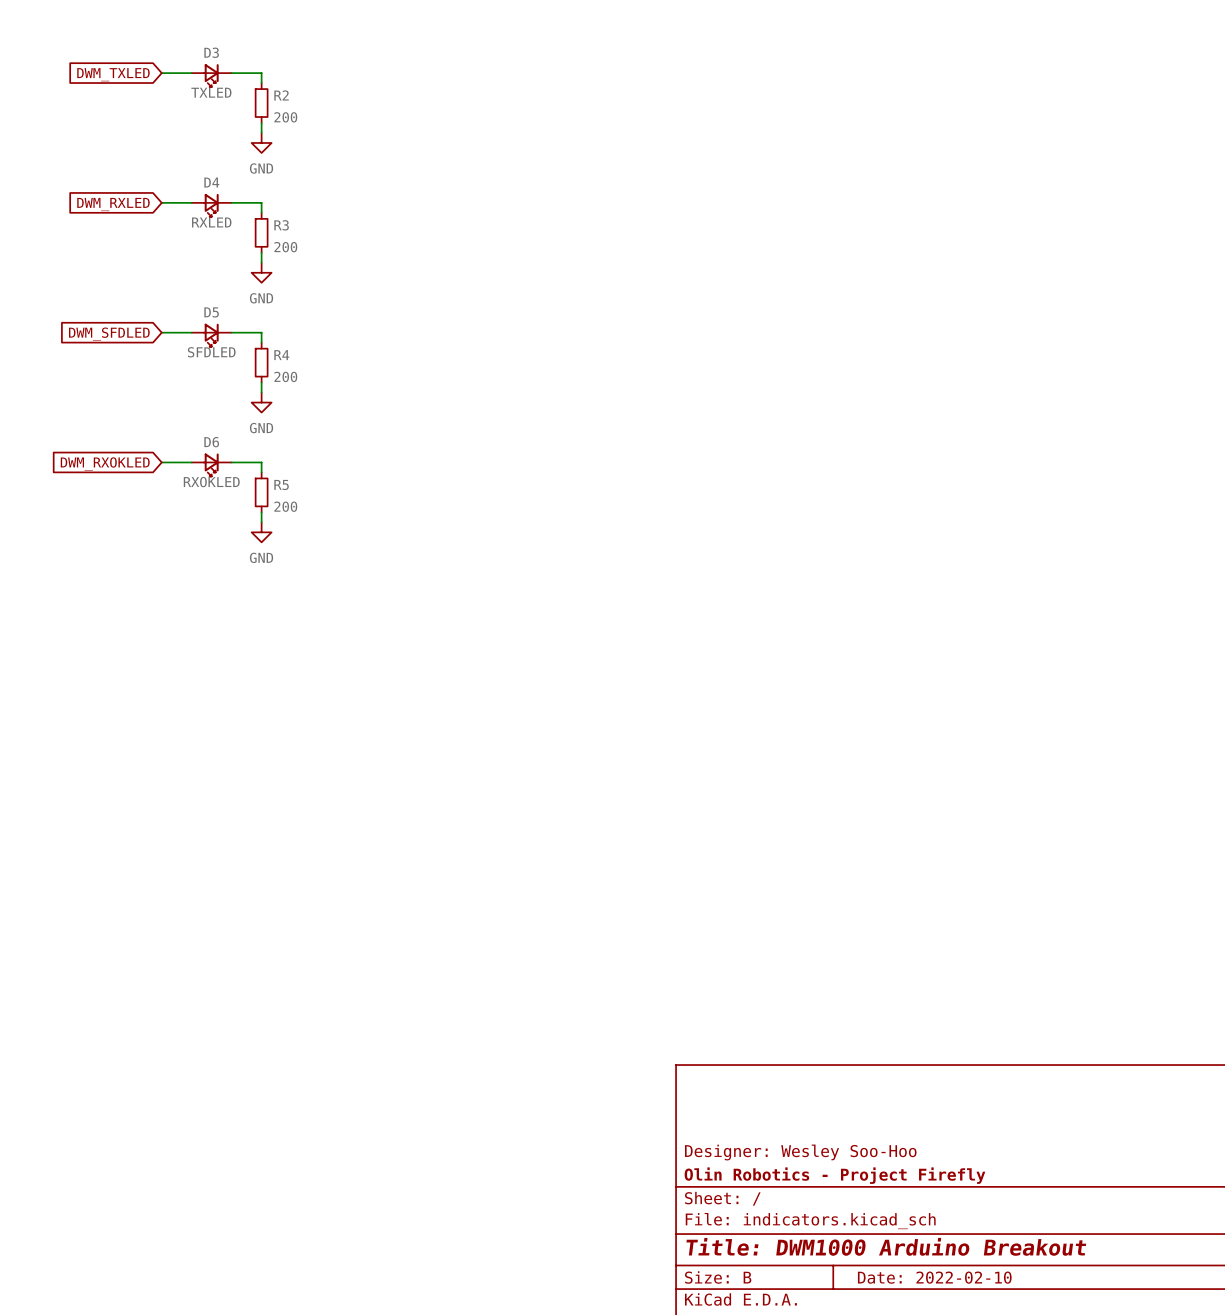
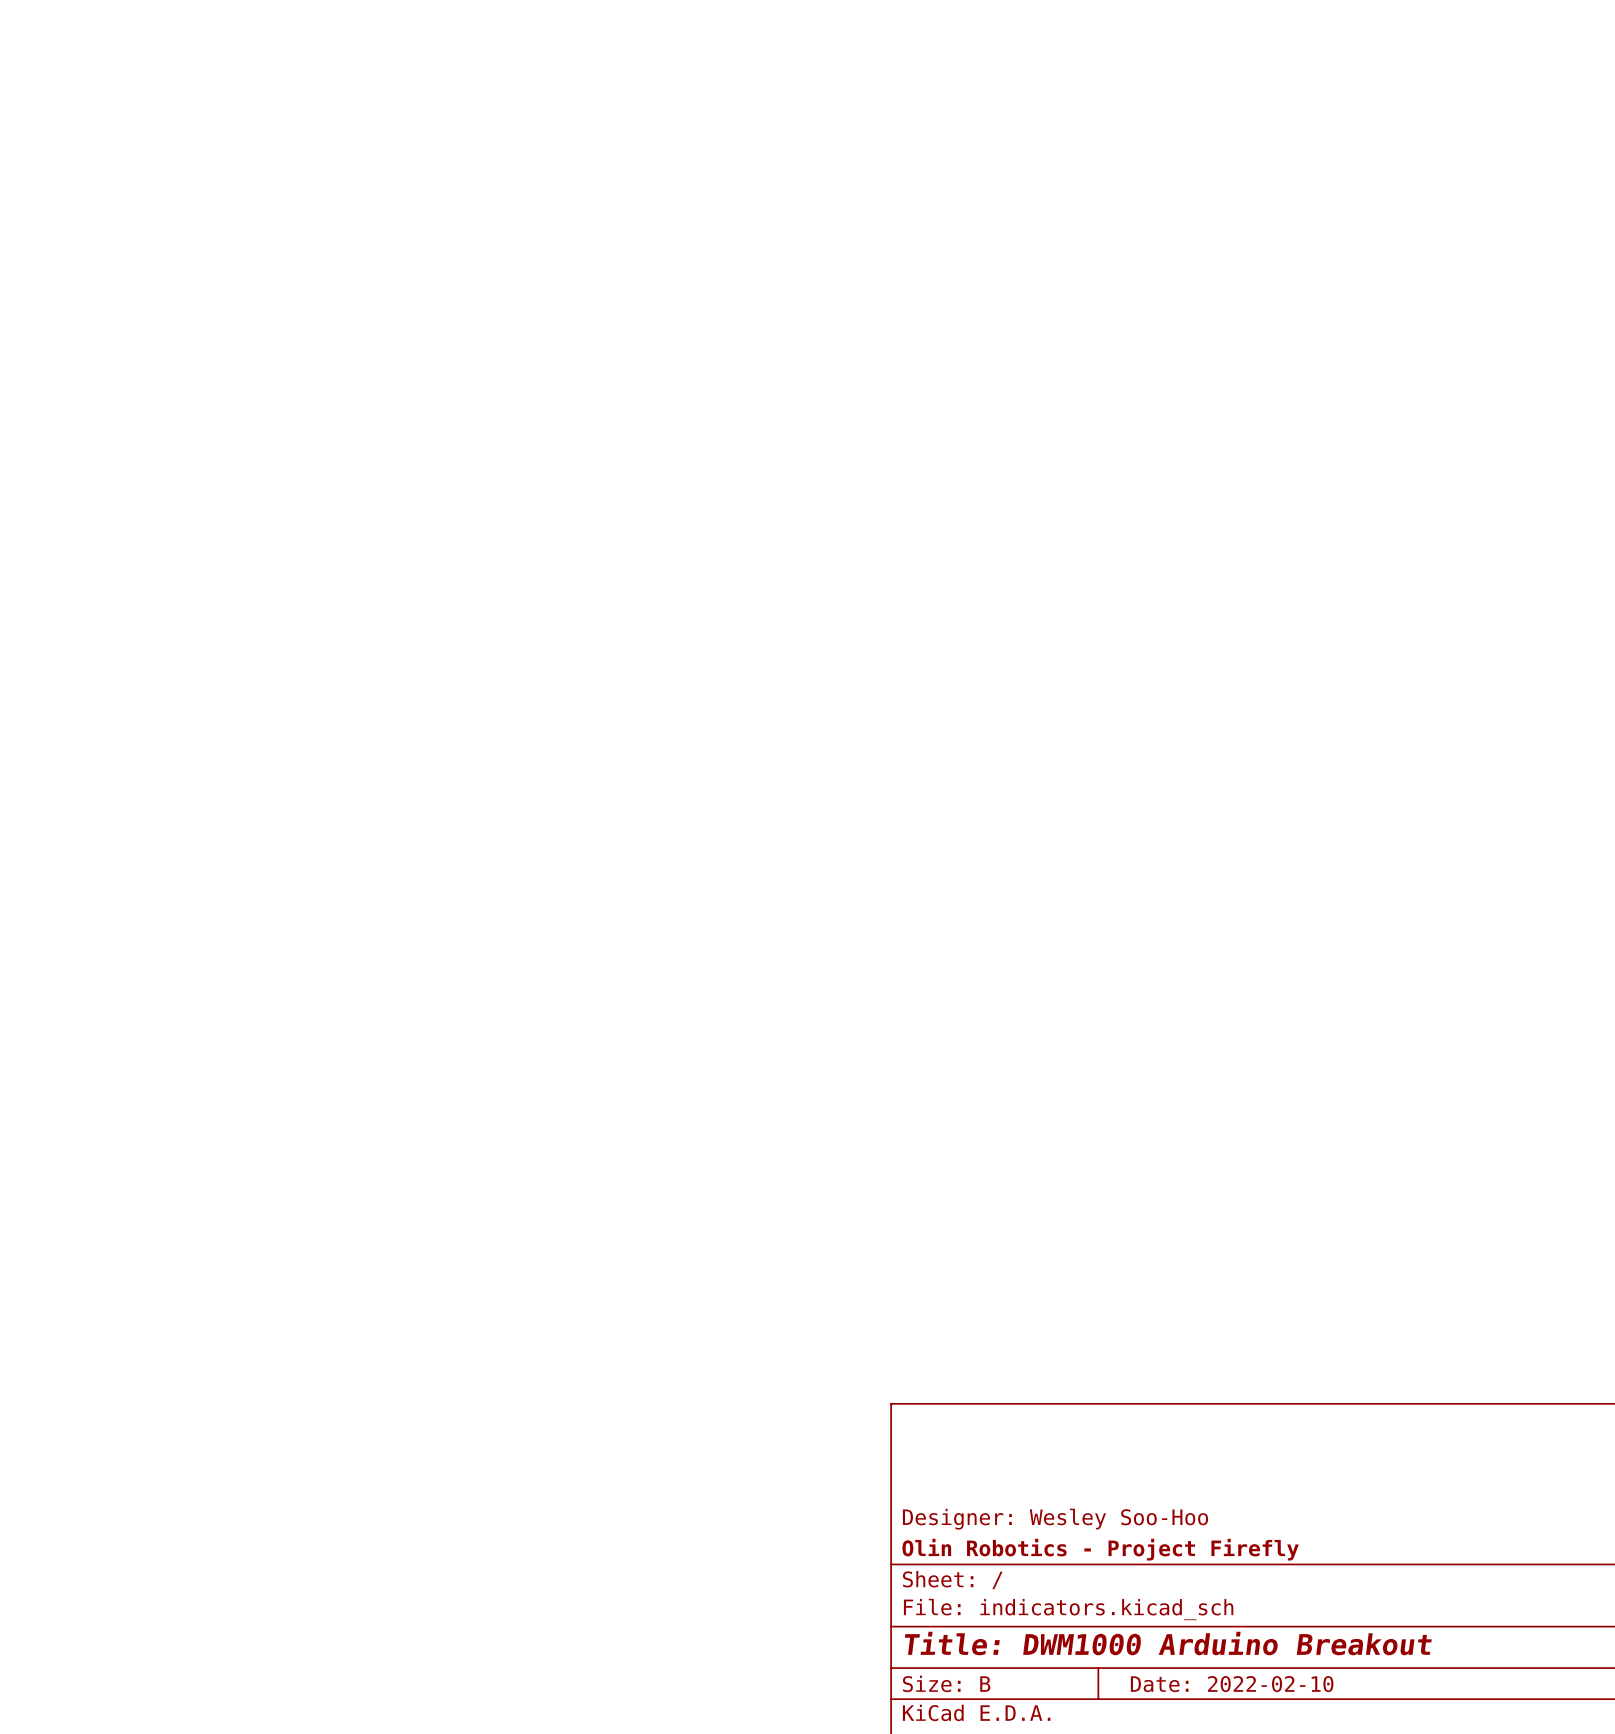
wire: (161, 73) (191, 73) -> none
wire: (231, 73) (261, 73) (261, 83) -> none
global label: DWM_TXLED (113, 74) -> none
D3: TXLED (211, 75) -> none
R2: 200 (261, 103) -> none
wire: (261, 123) (261, 133) -> none
power symbol: GND (261, 142) -> none
wire: (161, 202) (191, 202) -> none
wire: (231, 202) (261, 202) (261, 212) -> none
global label: DWM_RXLED (113, 204) -> none
D4: RXLED (211, 205) -> none
R3: 200 (261, 232) -> none
wire: (261, 252) (261, 262) -> none
power symbol: GND (261, 272) -> none
wire: (161, 332) (191, 332) -> none
wire: (231, 332) (261, 332) (261, 342) -> none
global label: DWM_SFDLED (109, 334) -> none
D5: SFDLED (211, 335) -> none
R4: 200 (261, 362) -> none
wire: (261, 382) (261, 392) -> none
power symbol: GND (261, 402) -> none
wire: (161, 462) (191, 462) -> none
wire: (231, 462) (261, 462) (261, 472) -> none
global label: DWM_RXOKLED (105, 463) -> none
D6: RXOKLED (211, 464) -> none
R5: 200 (261, 492) -> none
wire: (261, 512) (261, 522) -> none
power symbol: GND (261, 532) -> none

